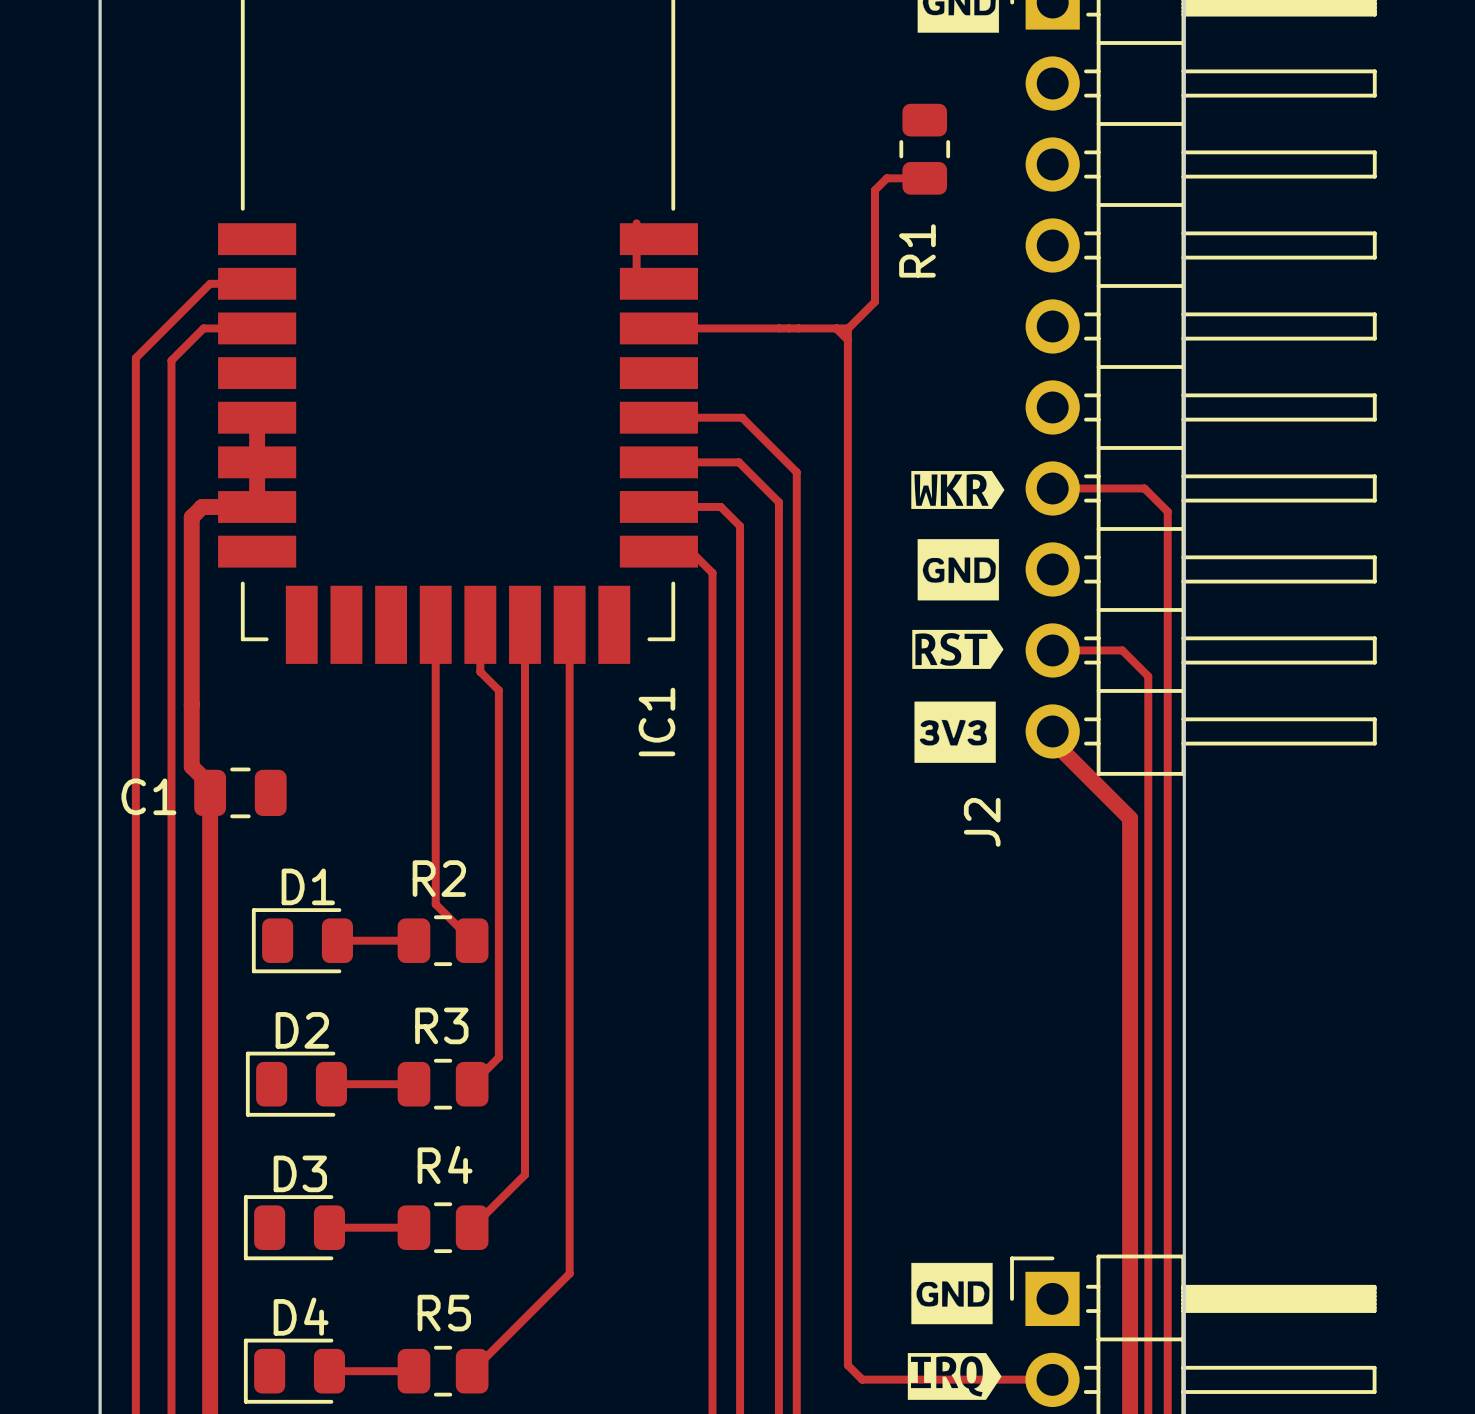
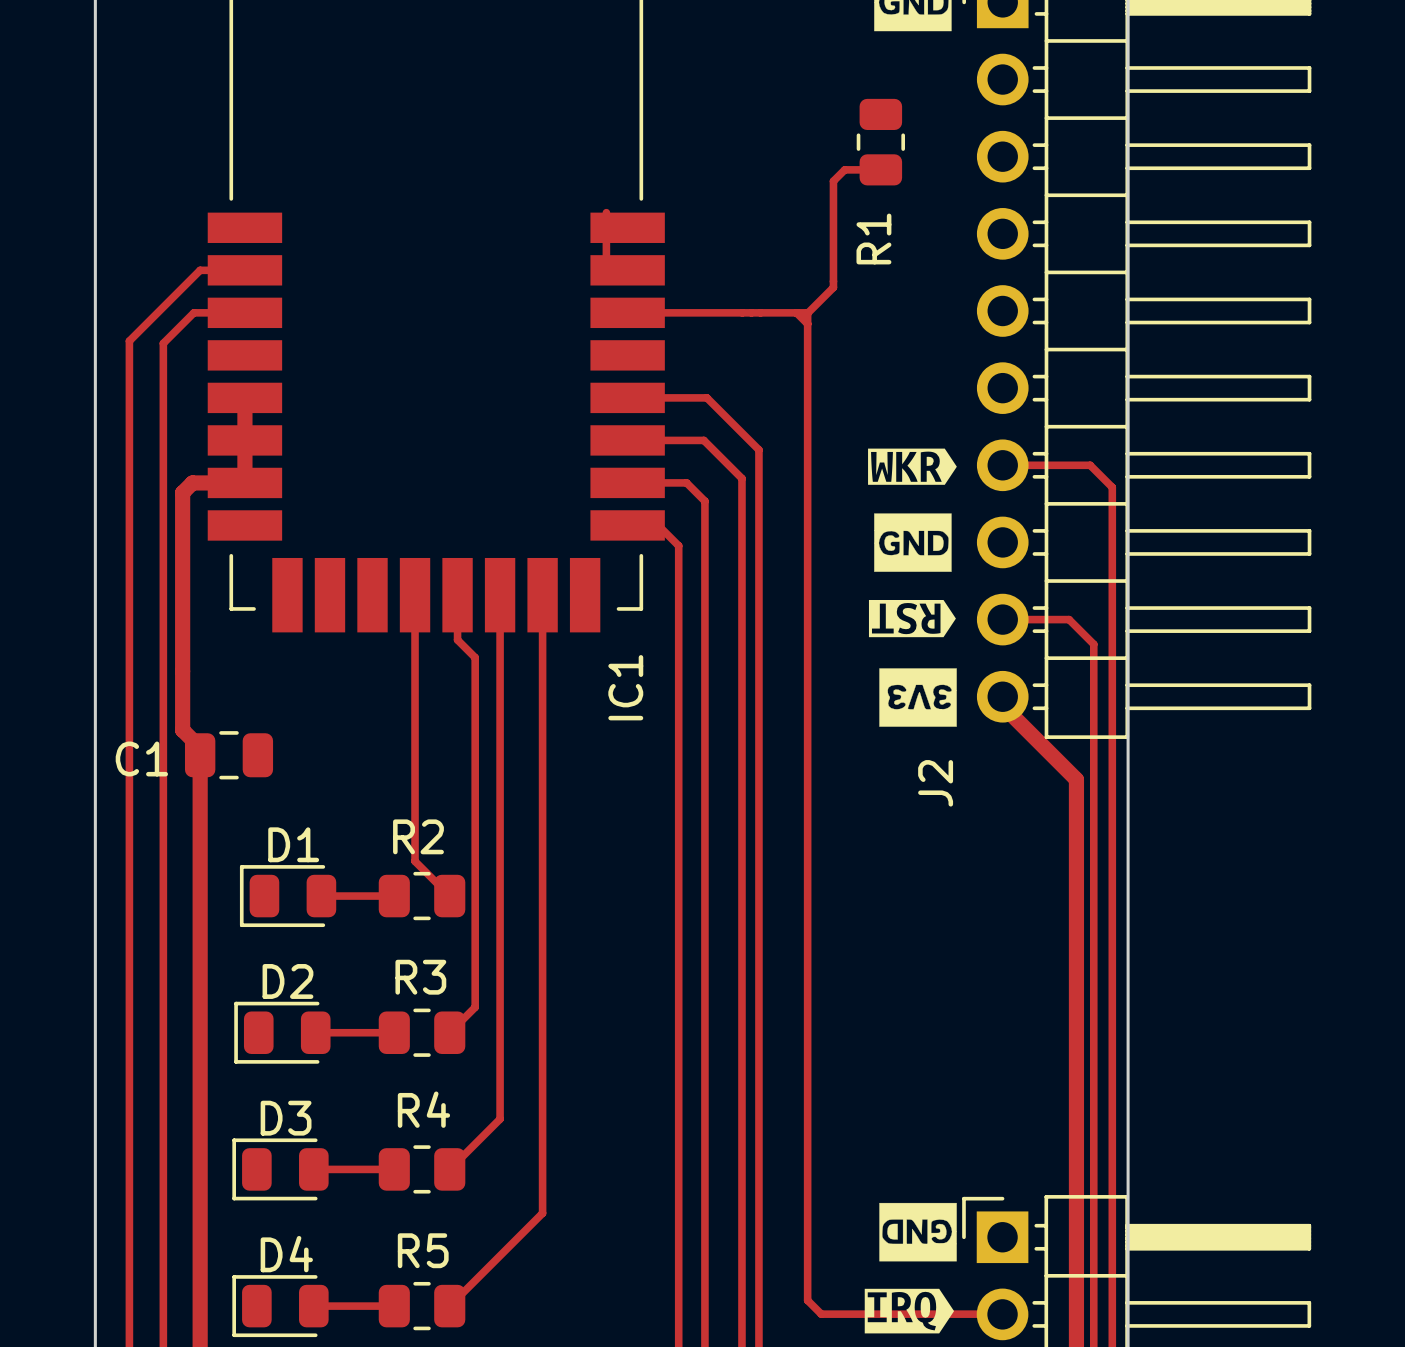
drawing shape: [912, 629, 1004, 669] -> [868, 599, 956, 638]
drawing shape: [914, 701, 996, 763] -> [879, 668, 957, 727]
drawing shape: [911, 1262, 993, 1325] -> [879, 1202, 957, 1262]

